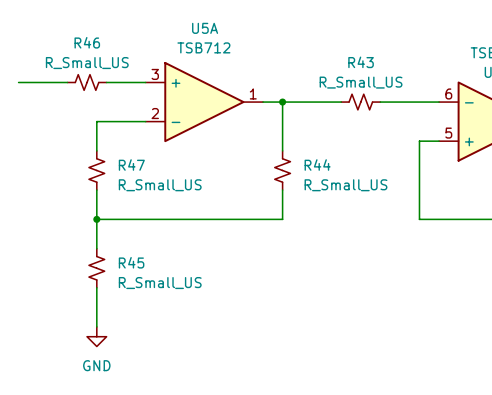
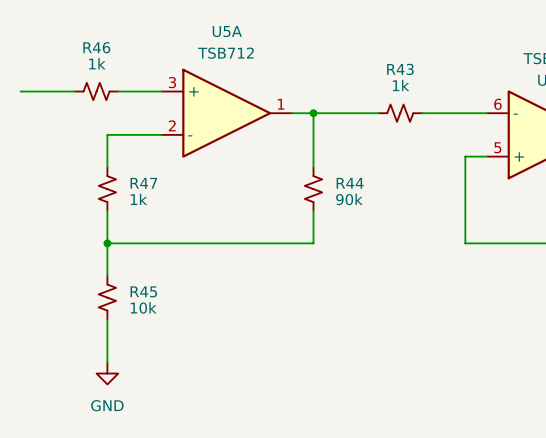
R46 value: R_Small_US (87, 63) -> 1k (97, 63)
R43 value: R_Small_US (361, 82) -> 1k (401, 85)
R47 value: R_Small_US (160, 185) -> 1k (138, 199)
R44 value: R_Small_US (345, 185) -> 90k (349, 199)
R45 value: R_Small_US (160, 283) -> 10k (143, 307)

